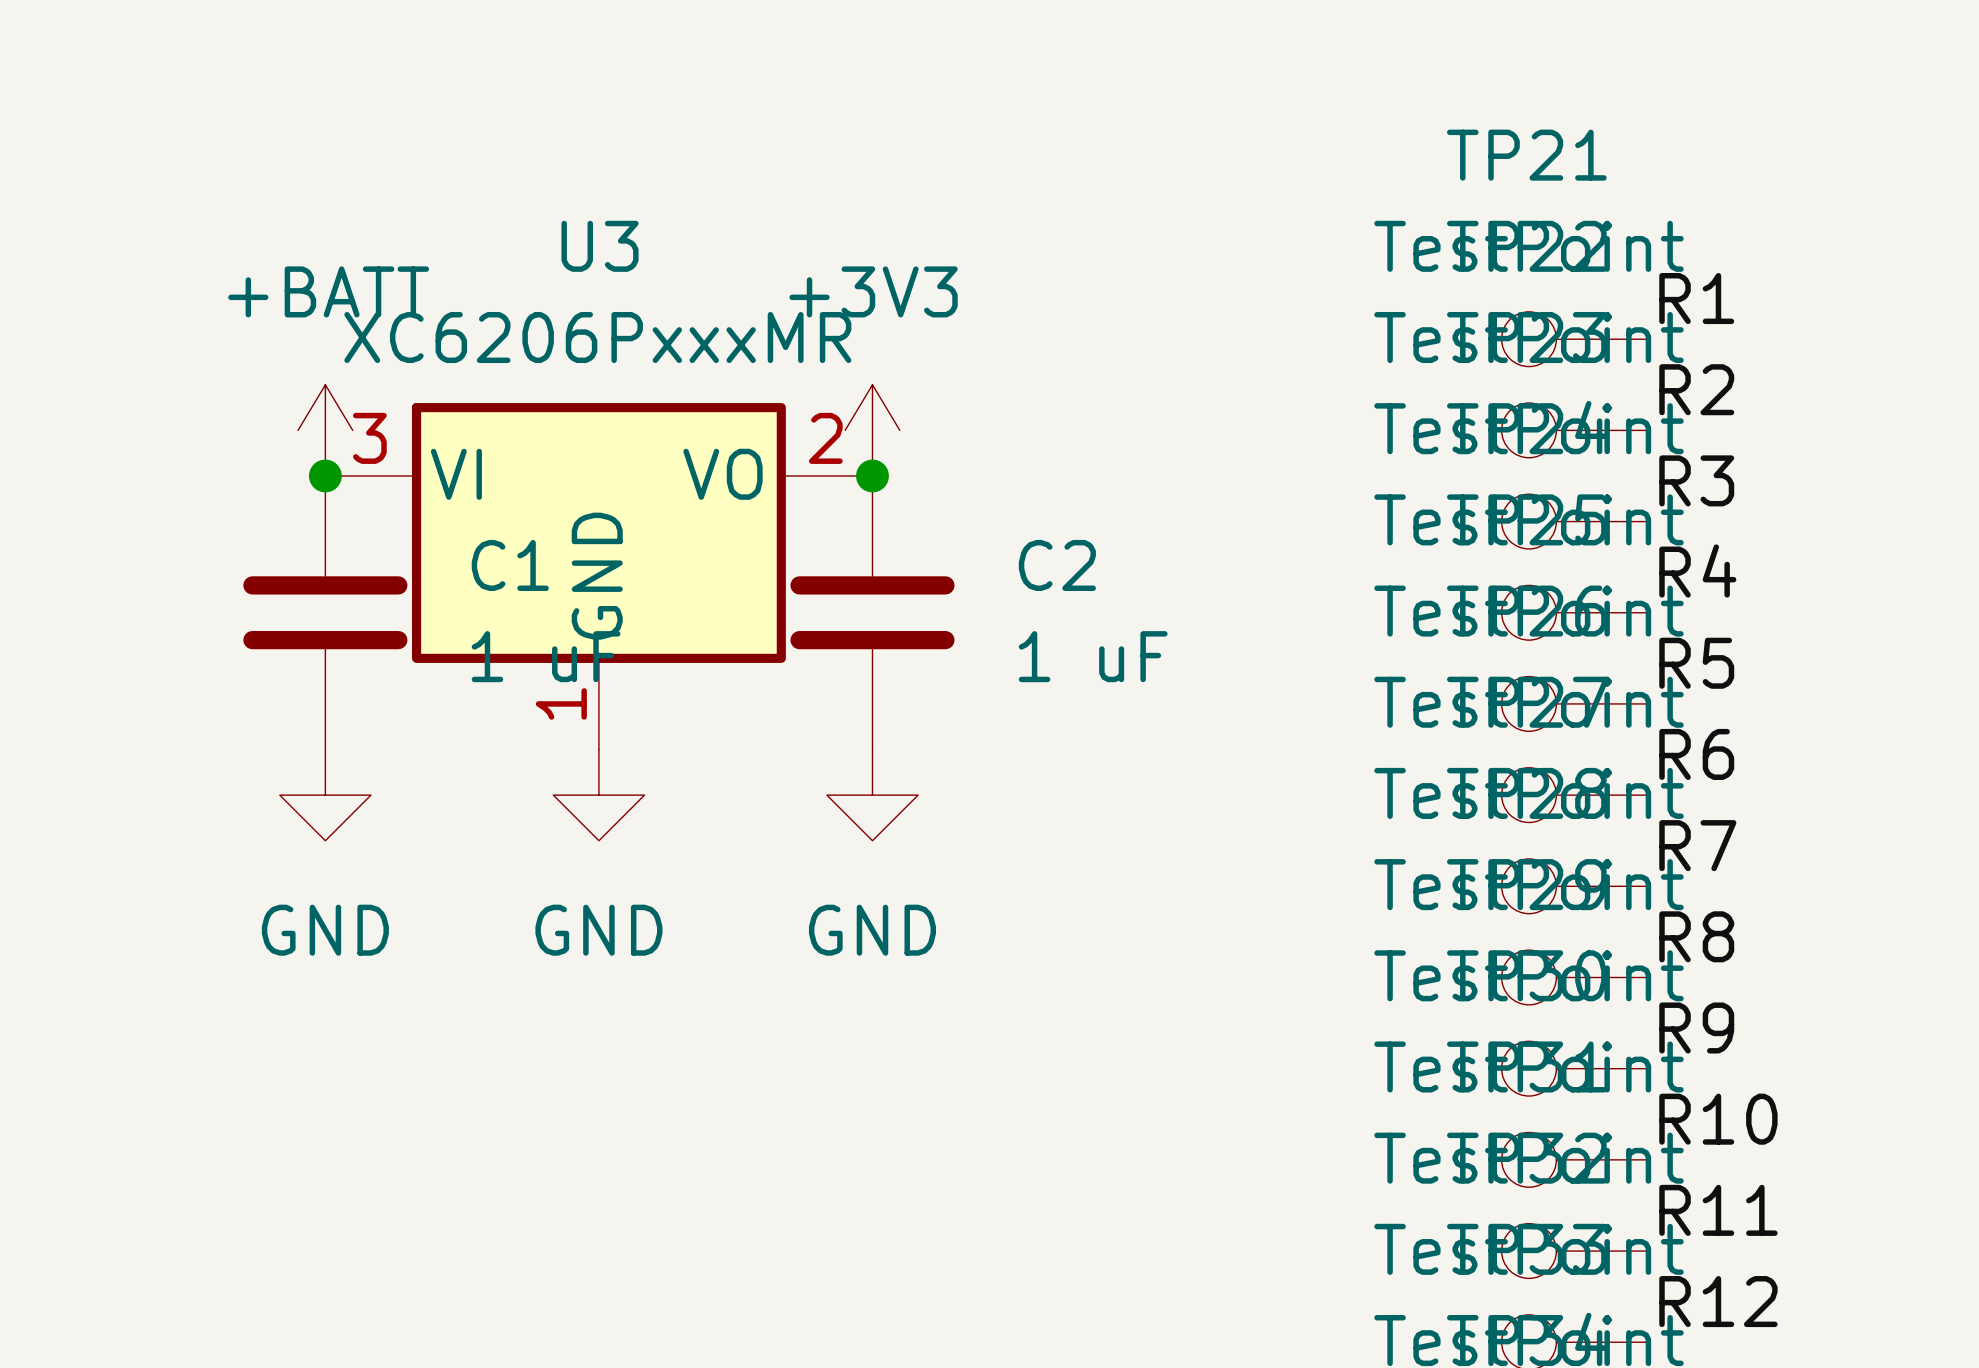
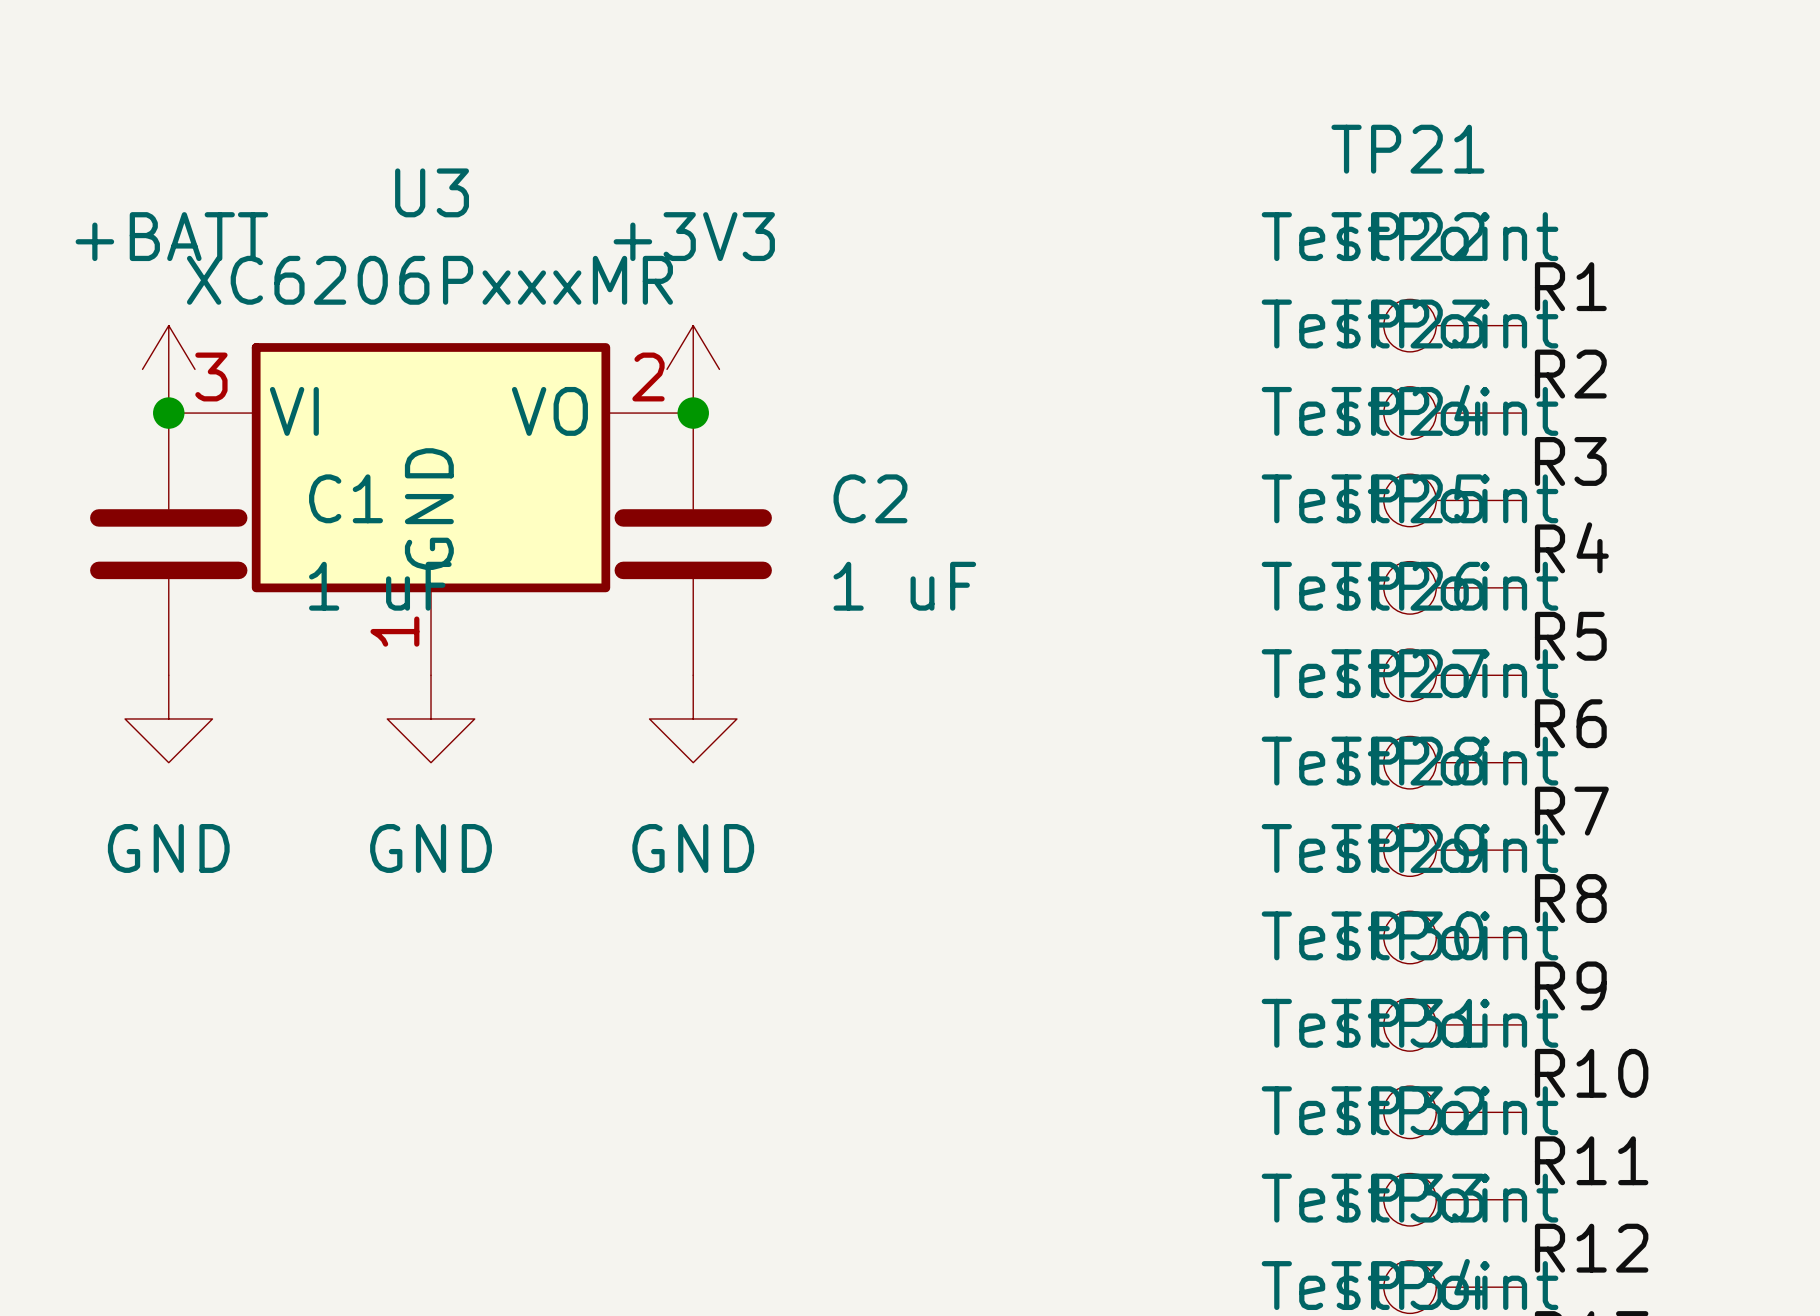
power symbol position: +BATT (325, 430) -> +BATT (168, 369)
power symbol position: +3V3 (872, 430) -> +3V3 (693, 369)
junction position: (325, 475) -> (168, 413)
junction position: (872, 475) -> (693, 413)
U3 position: (598, 576) -> (431, 509)
C1 position: (325, 612) -> (168, 544)
C2 position: (872, 612) -> (693, 544)
power symbol: none -> GND (168, 718)
power symbol: none -> GND (431, 718)
power symbol: none -> GND (693, 718)
power symbol: GND (325, 795) -> none
power symbol: GND (598, 795) -> none
power symbol: GND (872, 795) -> none

